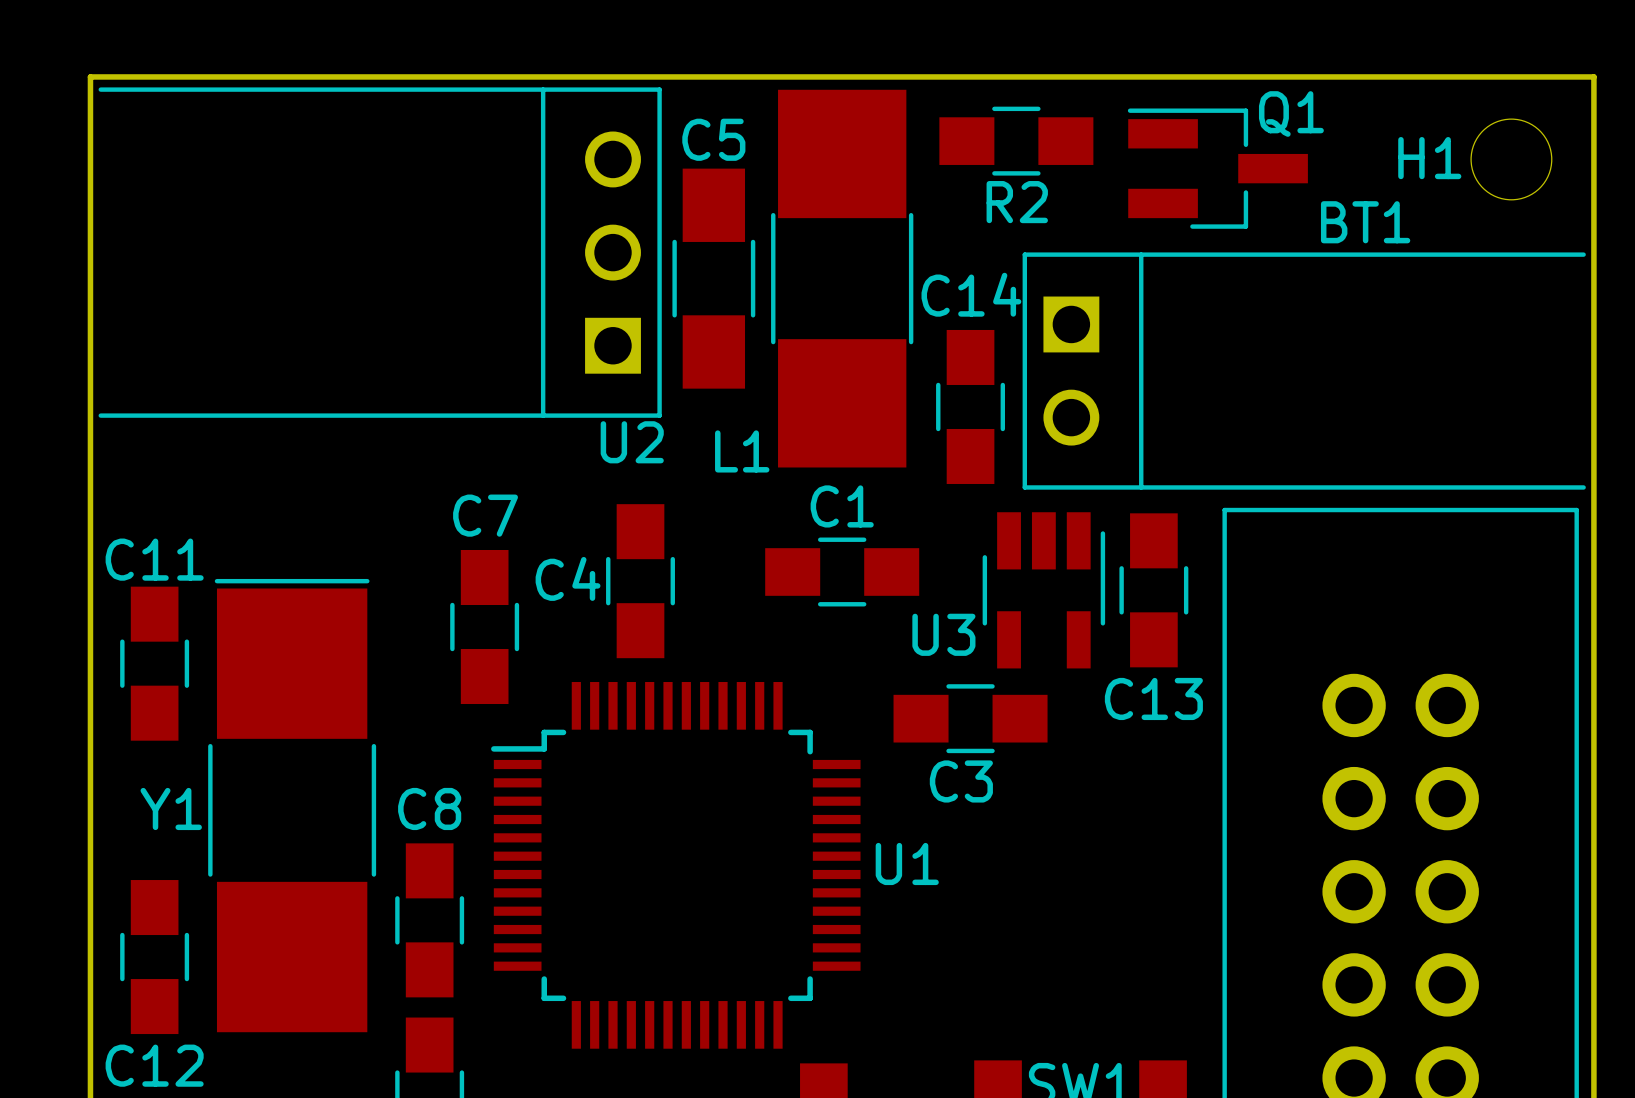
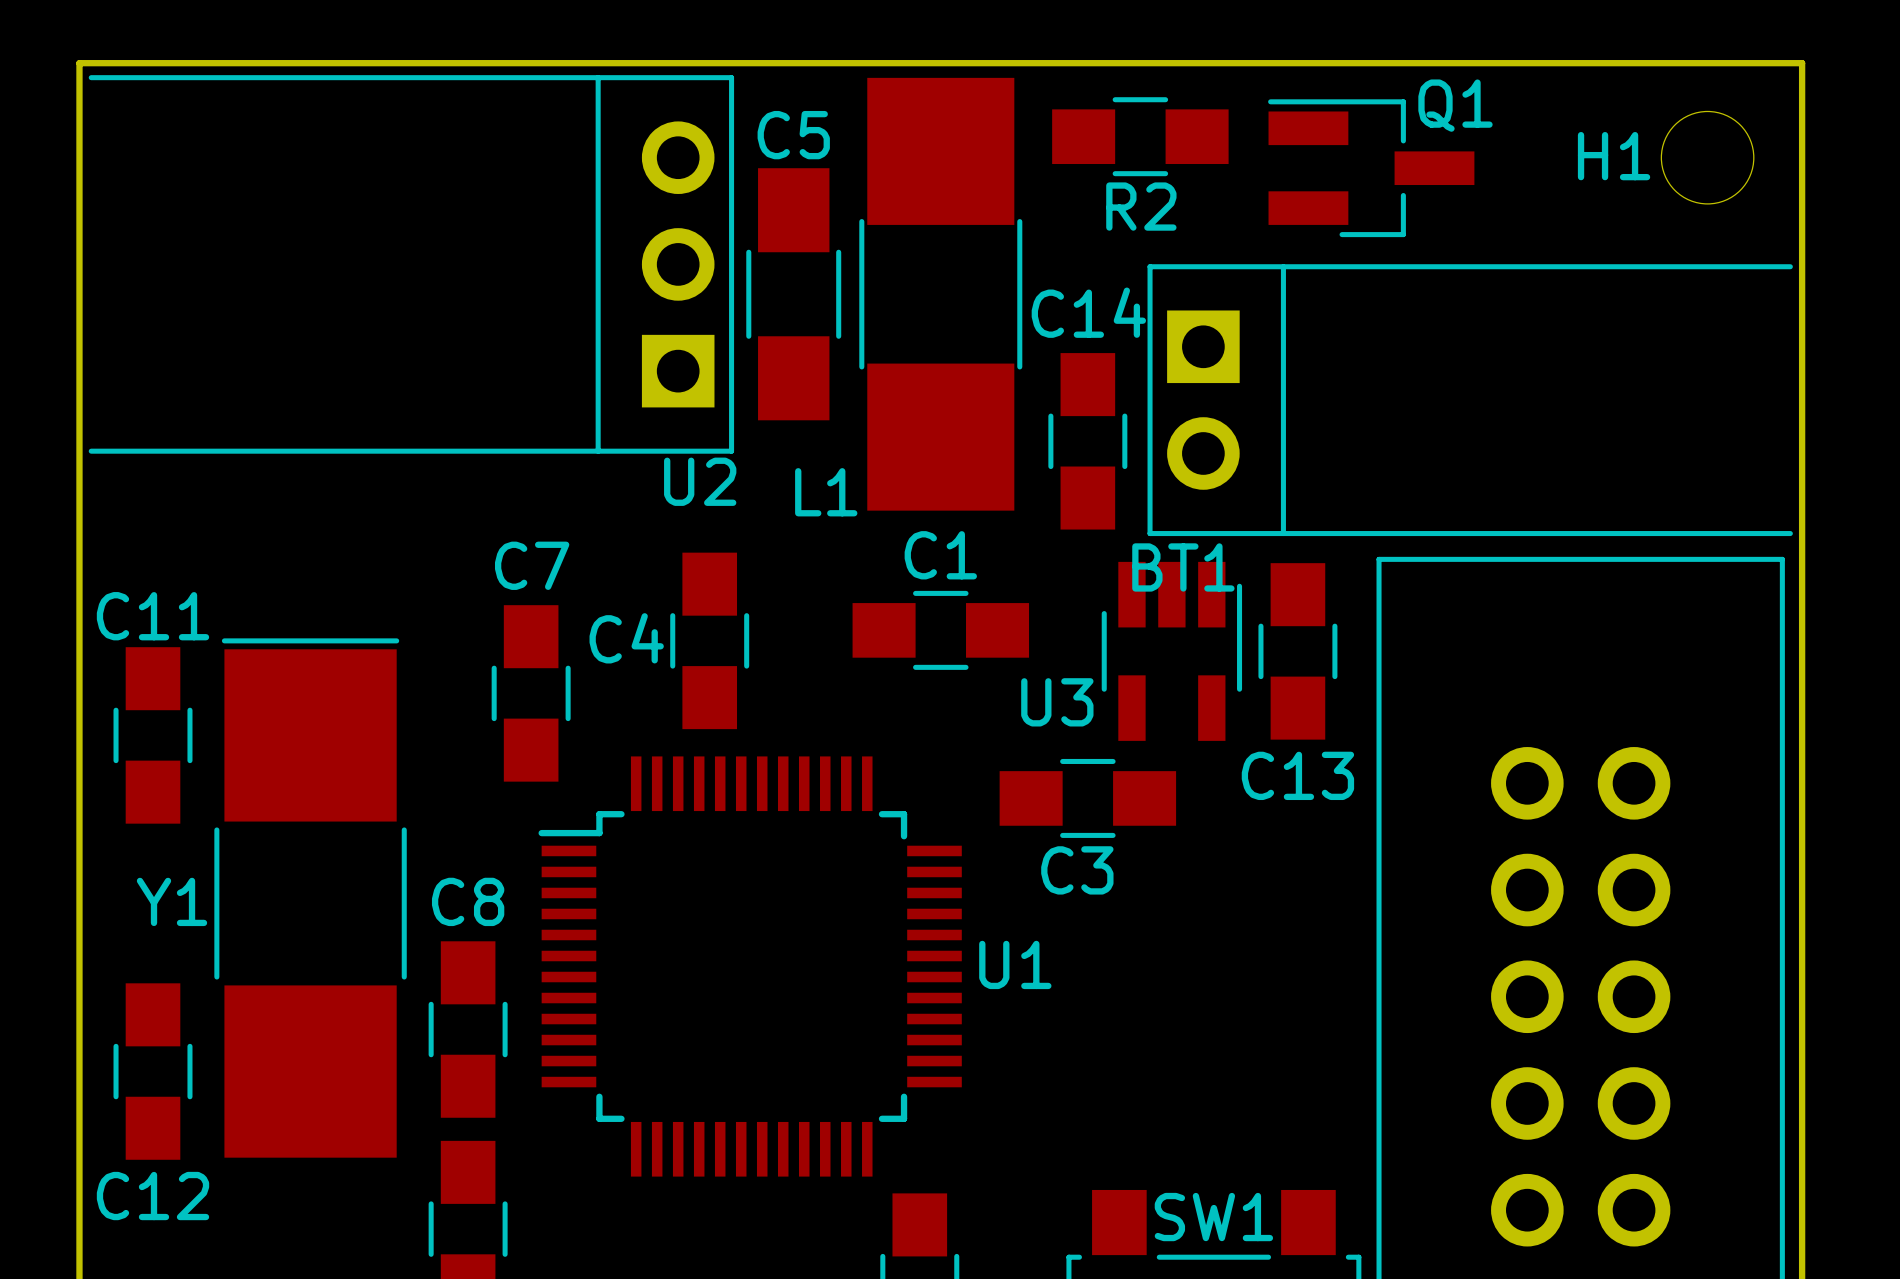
U2 footprint: [98, 87, 662, 418] -> [88, 75, 735, 454]
BT1 name position: BT1 (1365, 222) -> BT1 (1183, 567)
BT1 footprint: [1022, 252, 1586, 490] -> [1147, 264, 1793, 537]

